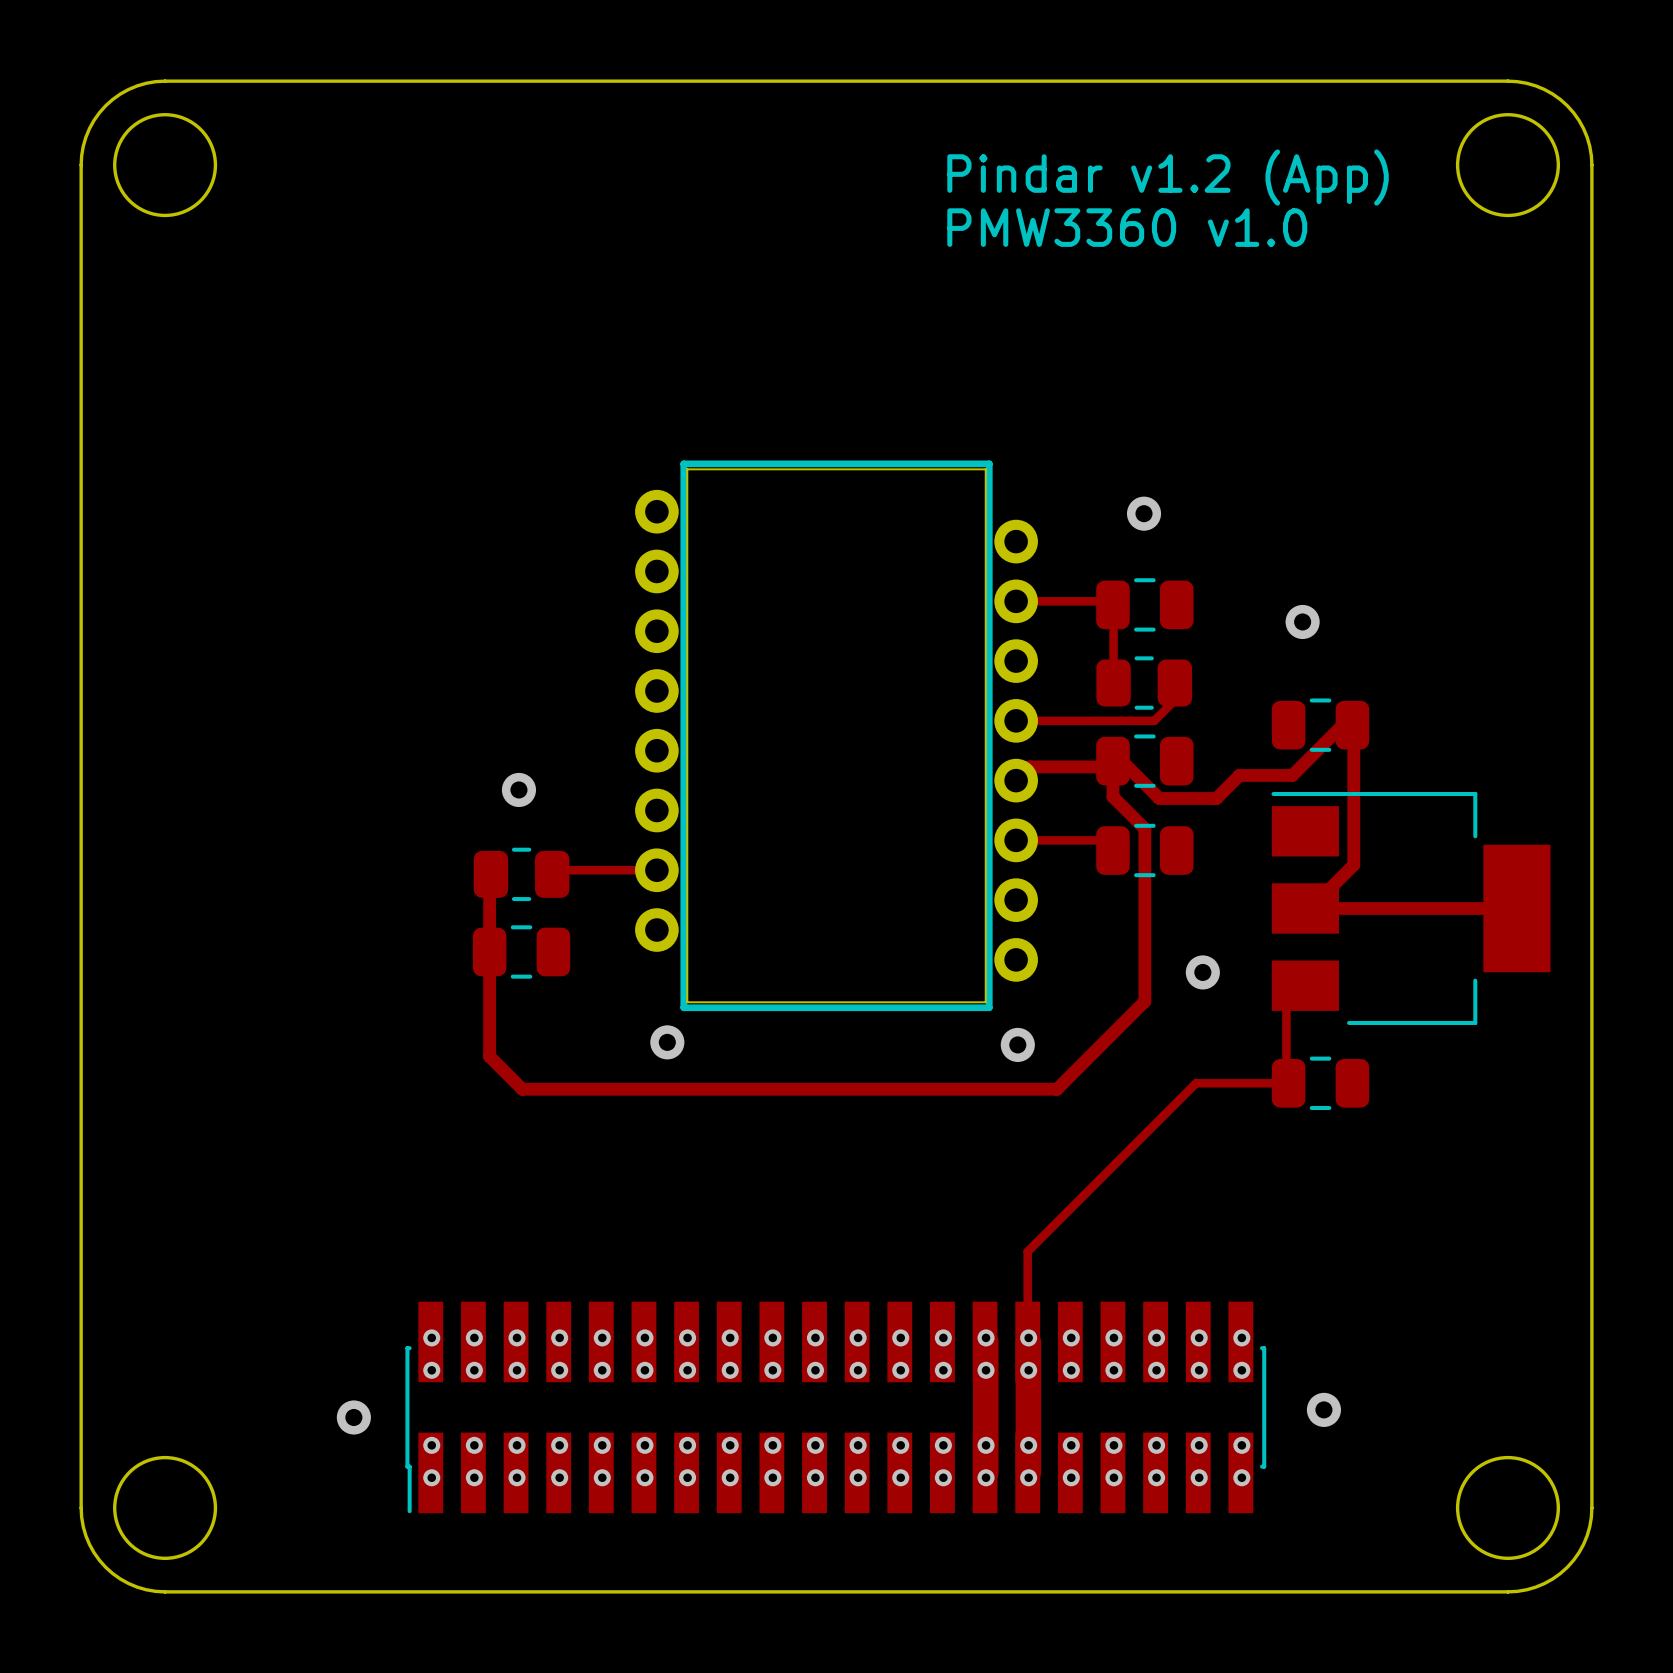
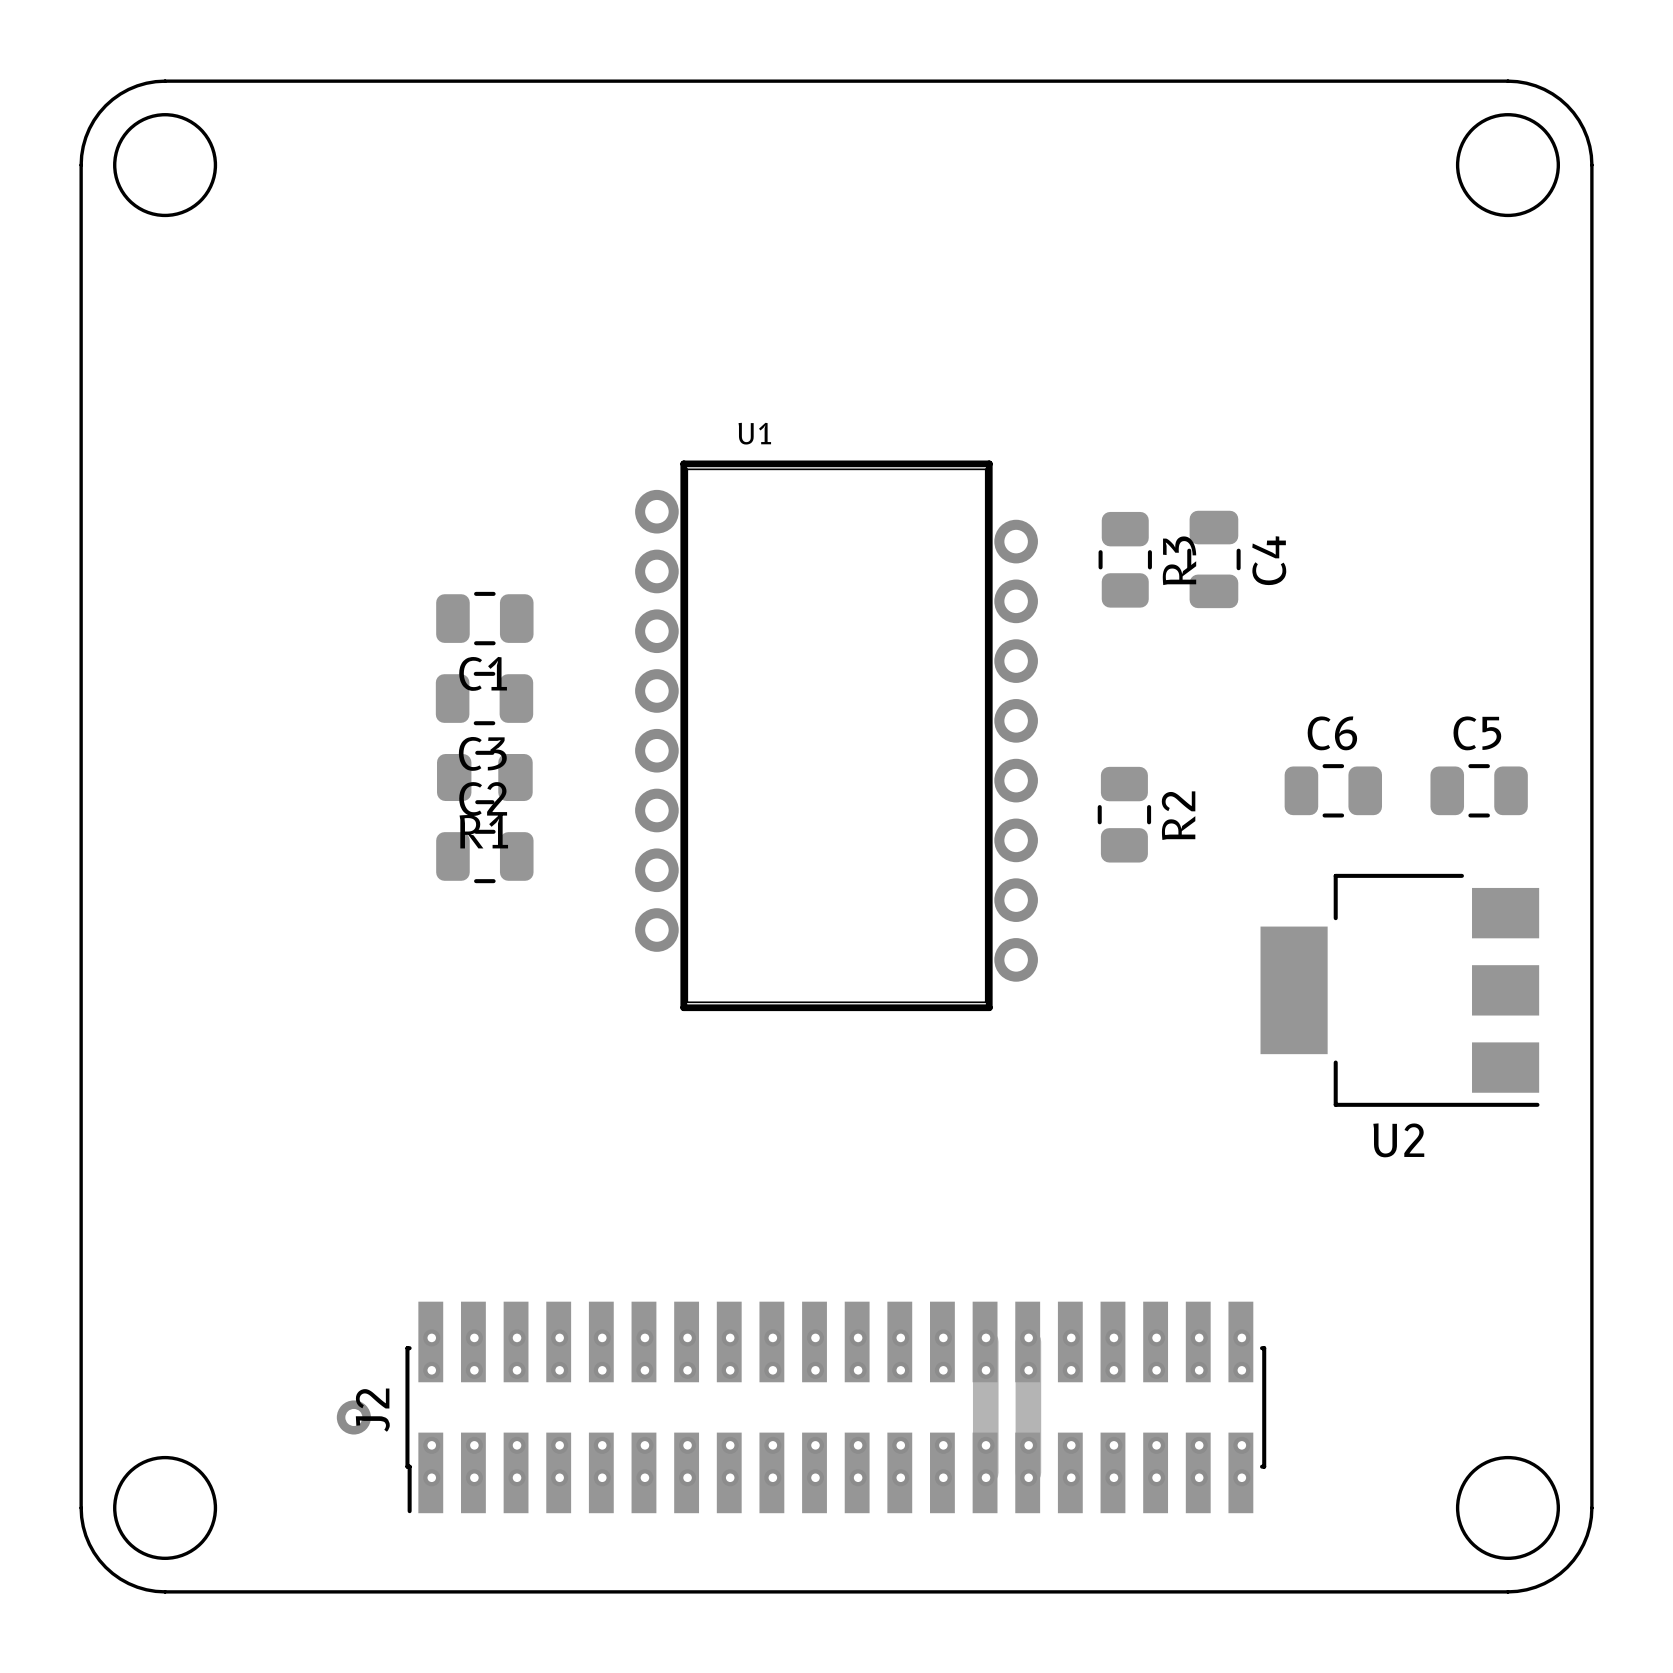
text: Pindar v1.2 (App) (1168, 177) -> none
text: PMW3360 v1.0 (1127, 227) -> none
U1 name: none -> U1 (754, 433)
via: (1144, 513) -> none
R3: none -> (1125, 559)
C4: none -> (1213, 559)
track: (1016, 601) (1109, 601) (1113, 605) (1113, 683) -> none
part: (1144, 604) -> none
C1: none -> (484, 618)
via: (1302, 621) -> none
part: (1144, 683) -> none
track: (1174, 683) (1174, 700) (1154, 720) (1016, 720) -> none
C3: none -> (484, 698)
part: (1320, 725) -> none
track: (1112, 761) (1112, 796) (1144, 828) (1144, 1001) (1057, 1089) (522, 1089) (489, 1056) (490, 874) -> none
track: (1112, 761) (1107, 766) (1029, 766) (1016, 780) -> none
track: (1112, 761) (1122, 761) (1159, 798) (1216, 798) (1239, 775) (1292, 775) (1342, 725) (1352, 725) (1353, 865) (1310, 908) -> none
part: (1144, 761) -> none
R1: none -> (484, 777)
via: (518, 789) -> none
C6: none -> (1333, 790)
C5: none -> (1479, 790)
R2: none -> (1124, 814)
track: (1016, 840) (1112, 840) -> none
part: (1144, 850) -> none
C2: none -> (484, 856)
track: (656, 870) (556, 870) (552, 874) -> none
part: (521, 874) -> none
track: (1305, 908) (1516, 908) -> none
part: (1411, 908) -> none
part: (521, 951) -> none
via: (1202, 972) -> none
track: (1305, 985) (1286, 1004) (1286, 1081) (1288, 1083) (1196, 1083) (1027, 1251) (1027, 1341) -> none
U2: none -> (1400, 990)
via: (667, 1042) -> none
via: (1017, 1044) -> none
part: (1320, 1083) -> none
J2 name: none -> J2 (372, 1410)
via: (1323, 1409) -> none

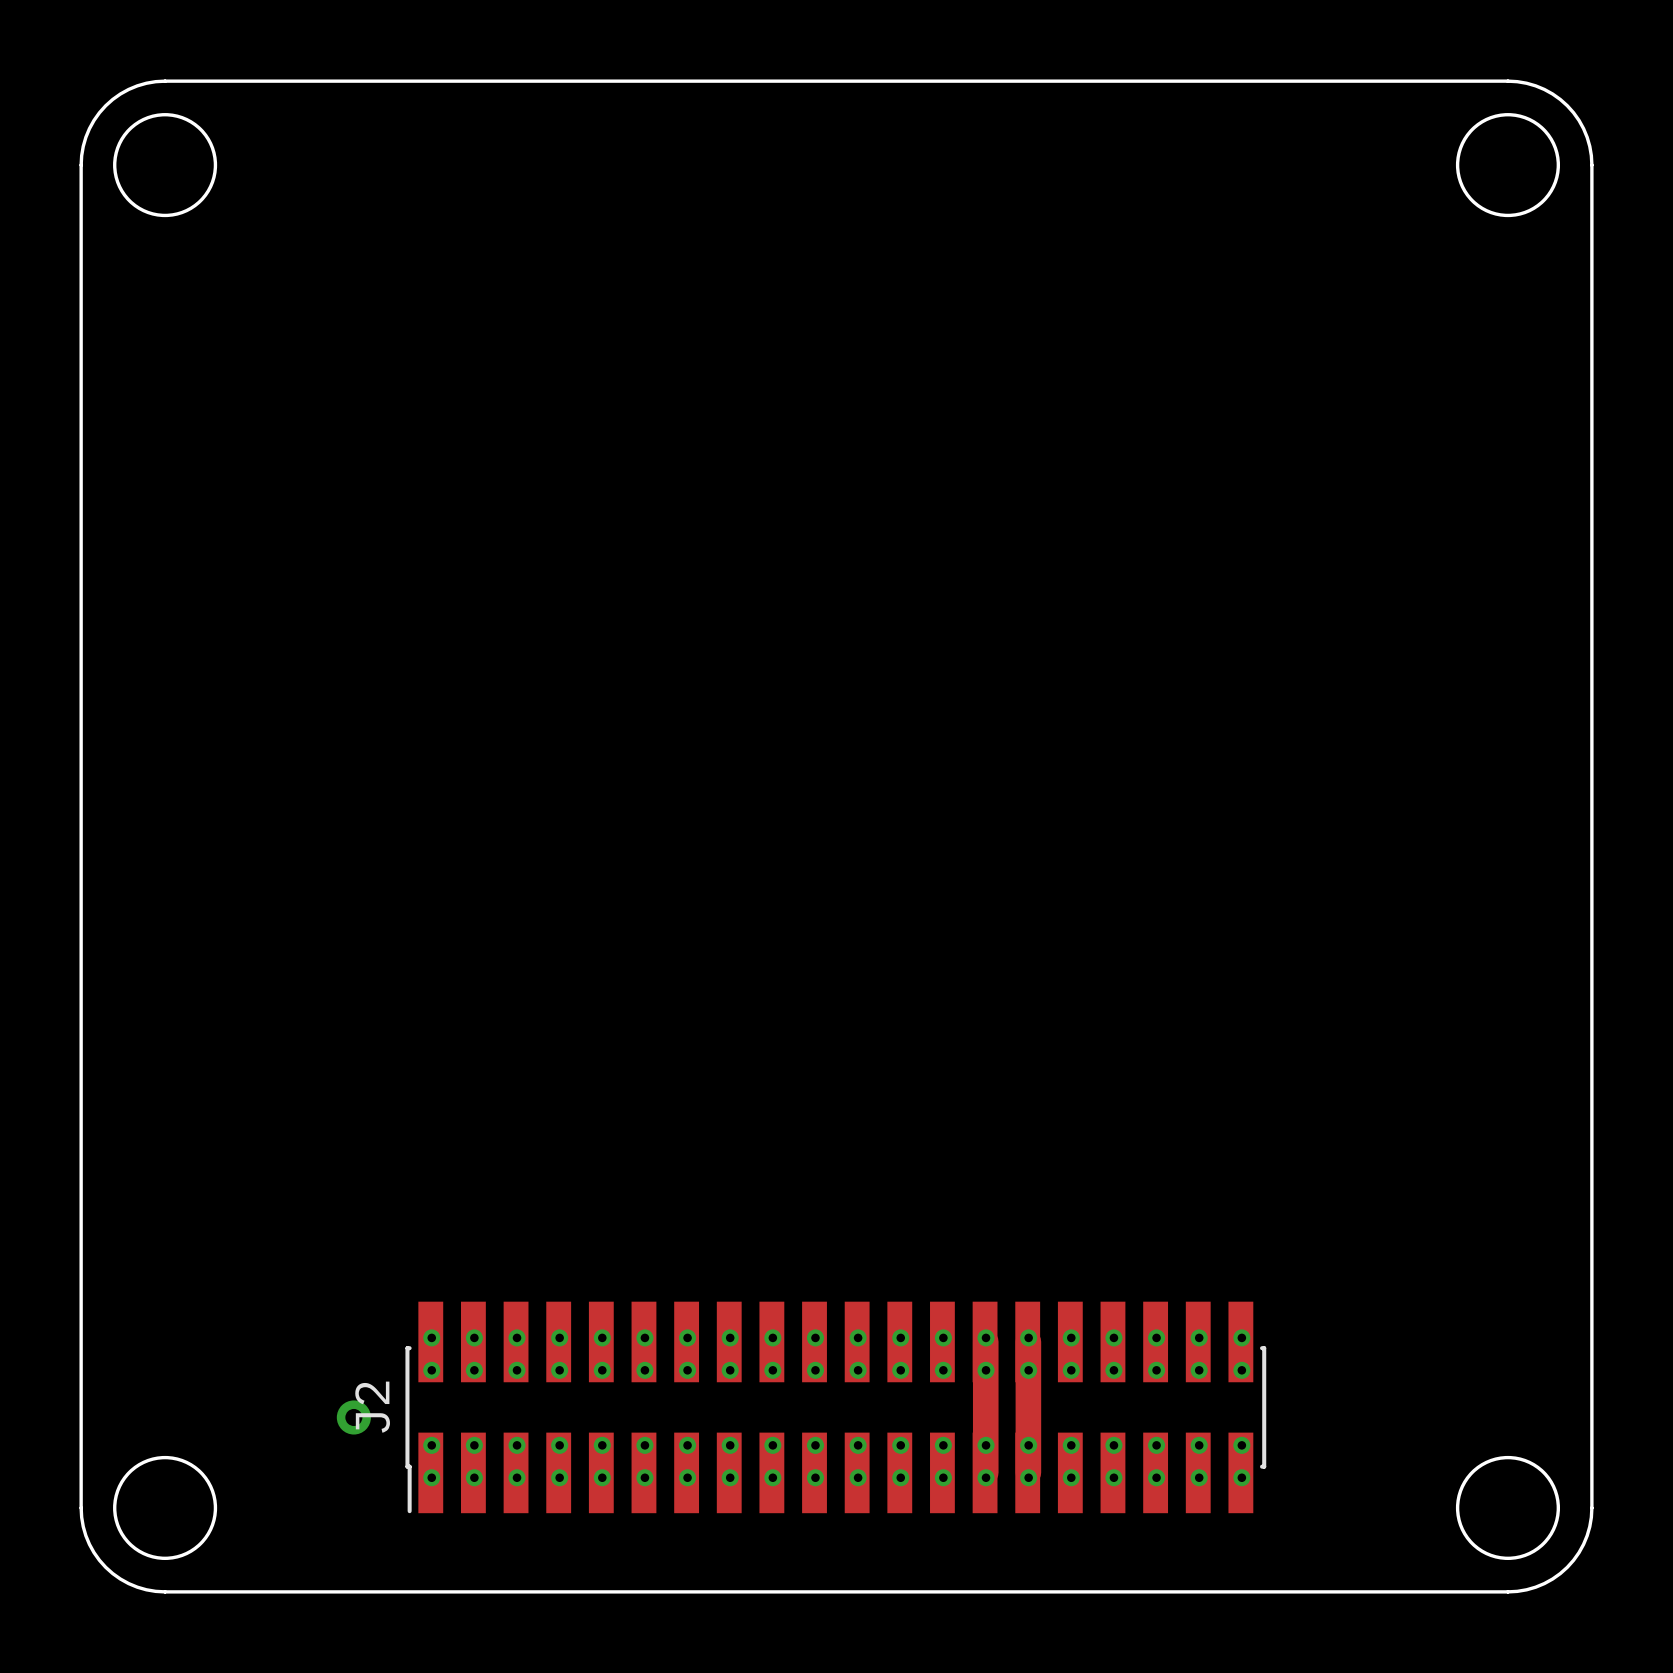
R3: (1125, 559) -> none
C4: (1213, 559) -> none
C1: (484, 618) -> none
C3: (484, 698) -> none
U1: (836, 735) -> none
R1: (484, 777) -> none
C6: (1333, 790) -> none
C5: (1479, 790) -> none
R2: (1124, 814) -> none
C2: (484, 856) -> none
U2: (1400, 990) -> none

